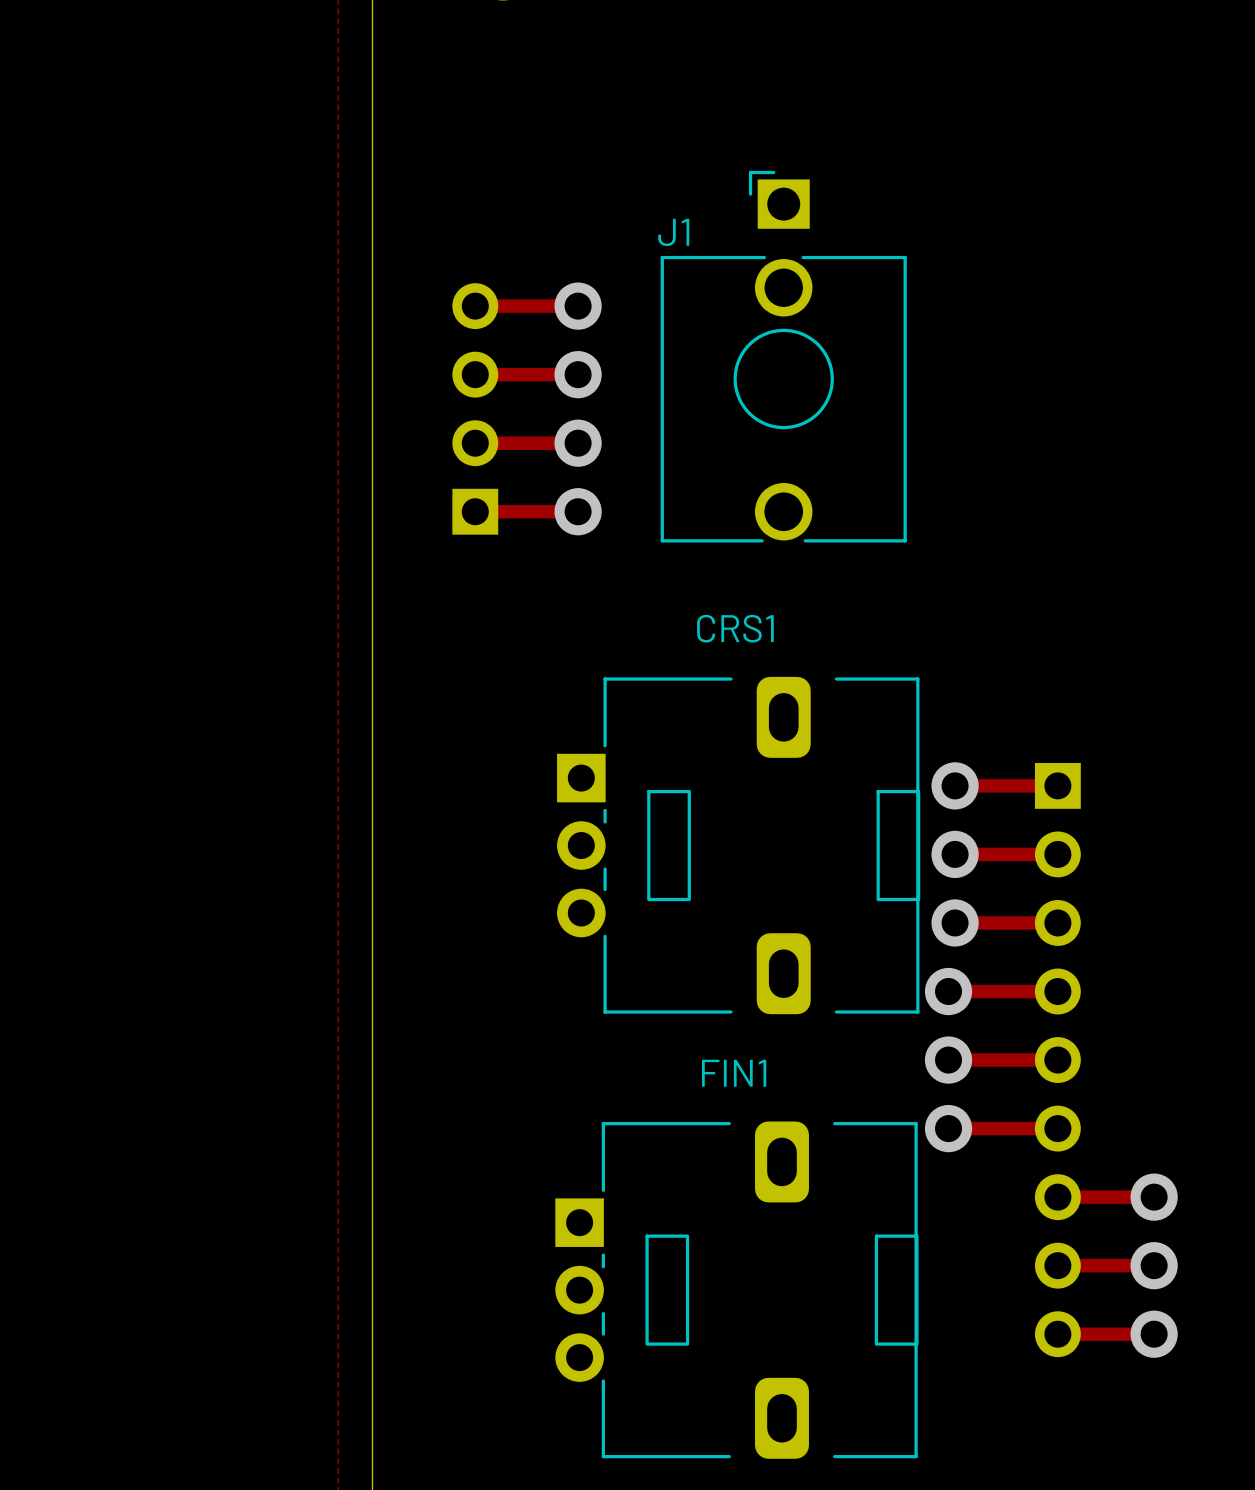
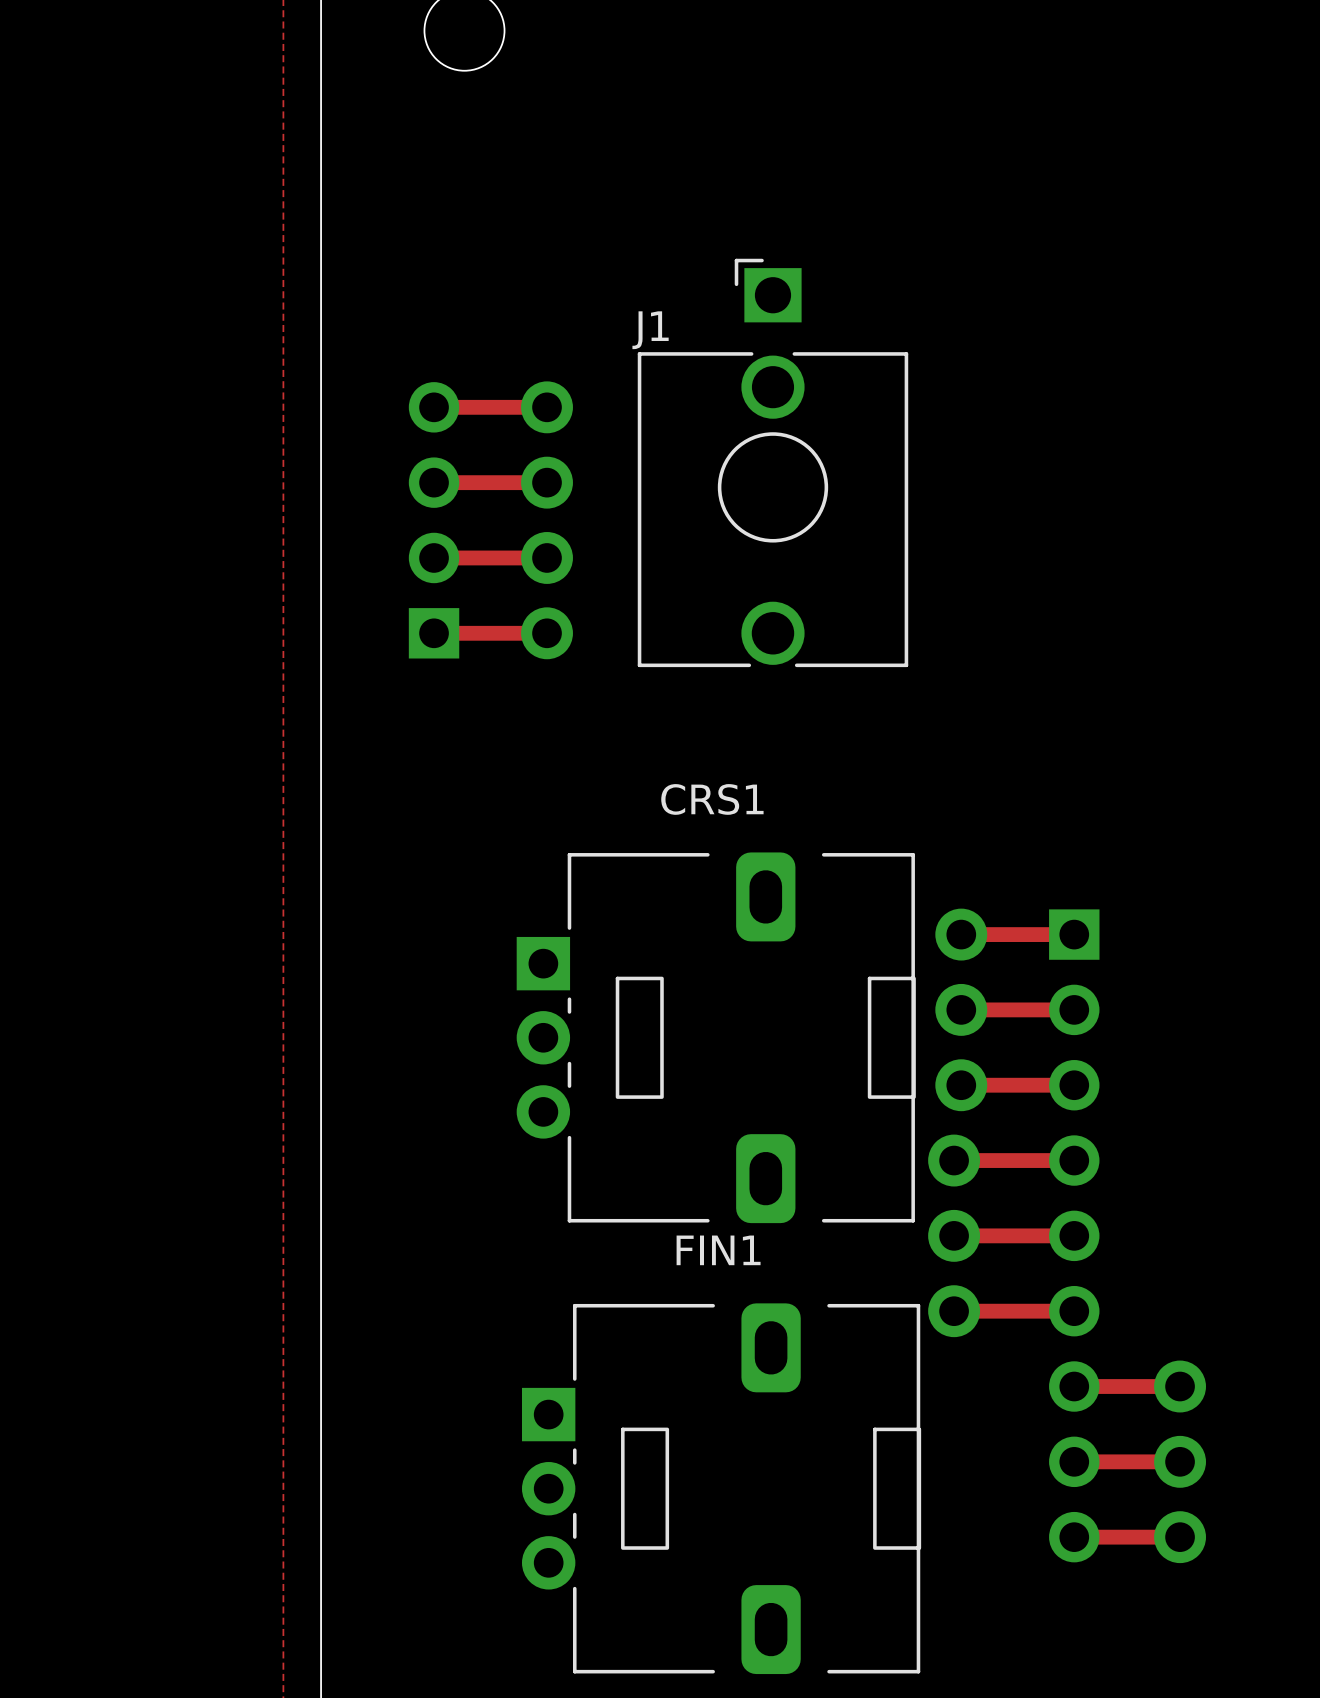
CRS1 position: (738, 845) -> (716, 1037)

